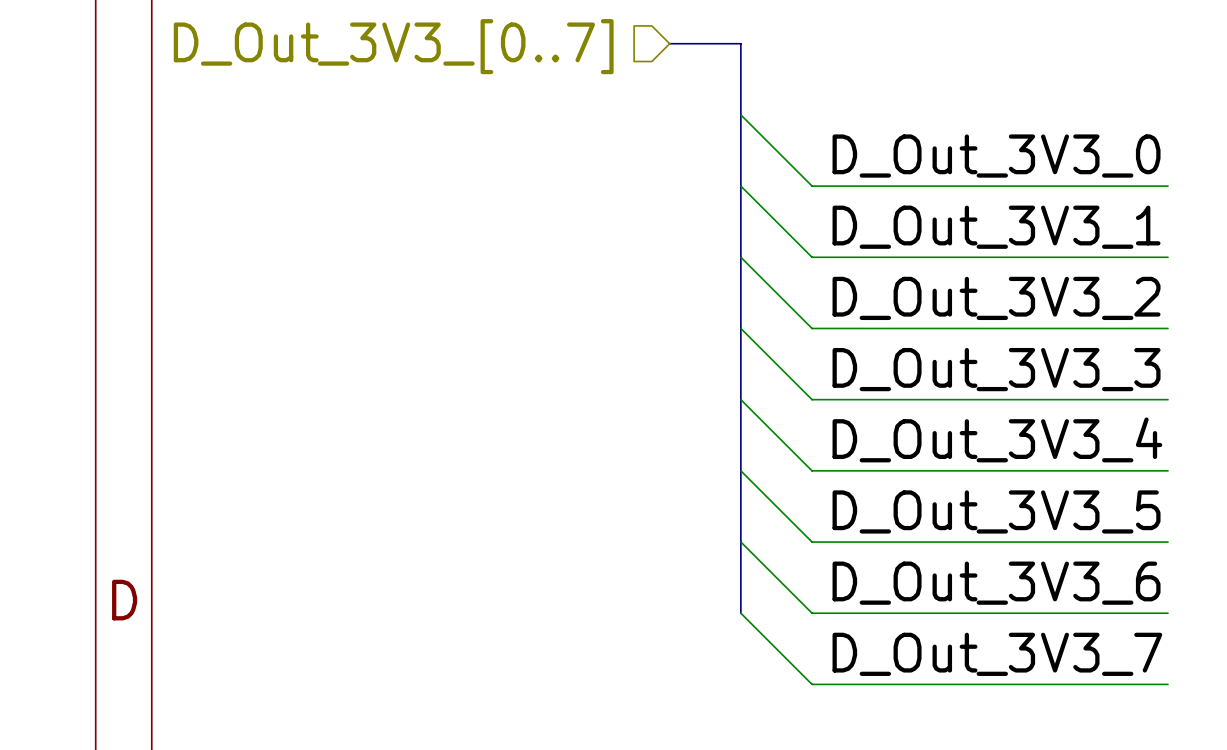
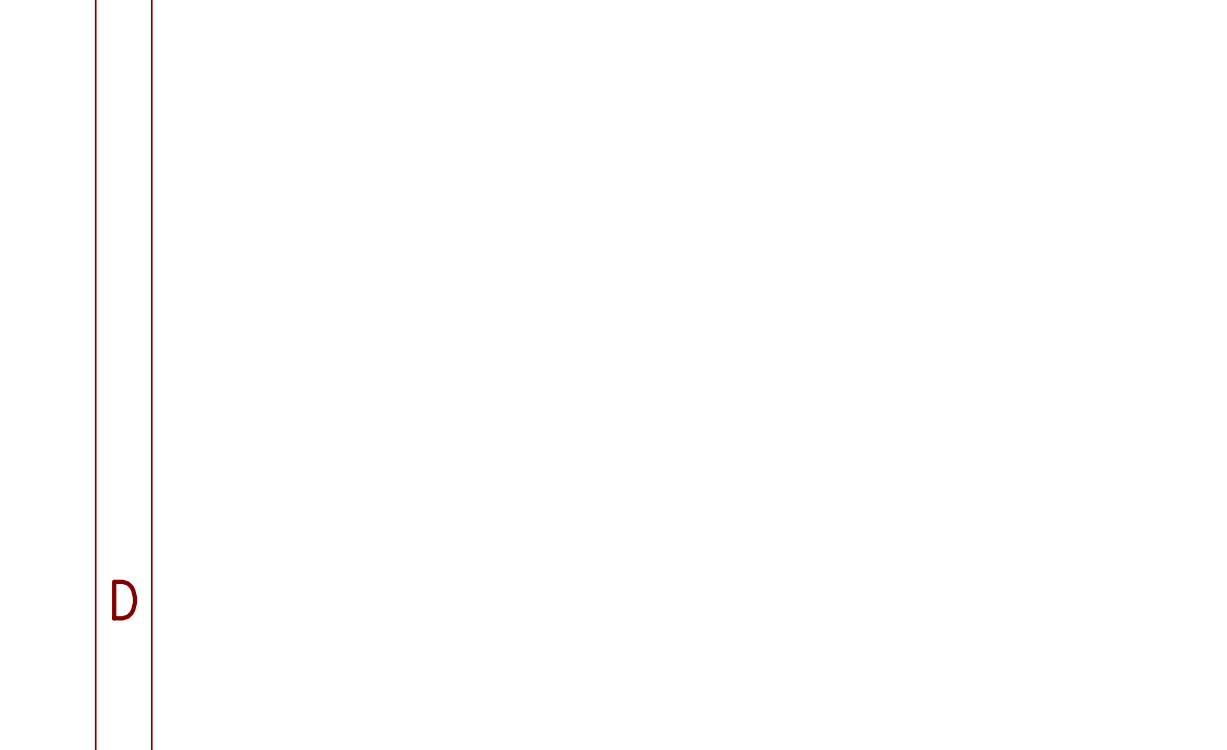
bus: (669, 43) (740, 43) (740, 613) -> none
hierarchical label: D_Out_3V3_[0..7] (393, 46) -> none
wire: (740, 114) (812, 186) (1167, 186) -> none
label: D_Out_3V3_0 (996, 156) -> none
wire: (740, 186) (812, 257) (1167, 257) -> none
label: D_Out_3V3_1 (996, 227) -> none
wire: (740, 257) (812, 328) (1167, 328) -> none
label: D_Out_3V3_2 (996, 298) -> none
wire: (740, 328) (812, 399) (1167, 399) -> none
label: D_Out_3V3_3 (996, 369) -> none
wire: (740, 399) (812, 470) (1167, 470) -> none
label: D_Out_3V3_4 (997, 439) -> none
wire: (740, 470) (812, 542) (1167, 542) -> none
label: D_Out_3V3_5 (996, 511) -> none
wire: (740, 542) (812, 613) (1167, 613) -> none
label: D_Out_3V3_6 (996, 583) -> none
wire: (740, 613) (812, 684) (1167, 684) -> none
label: D_Out_3V3_7 (997, 654) -> none

